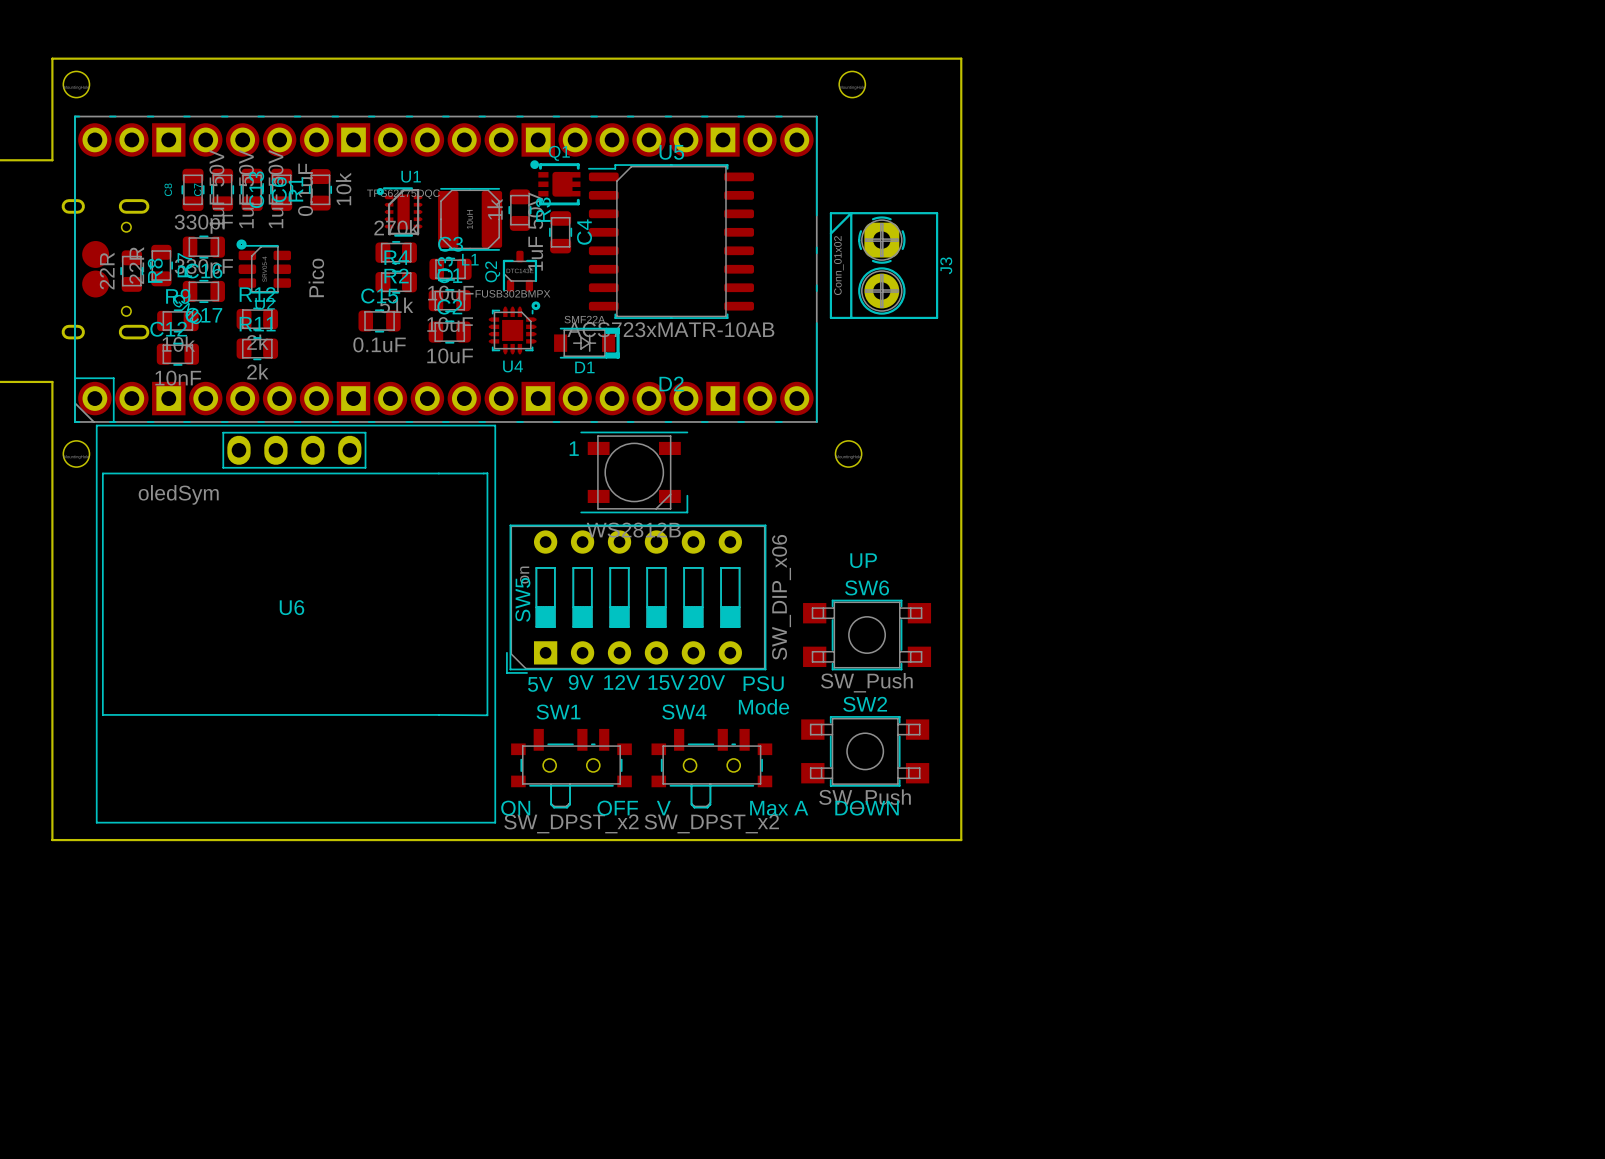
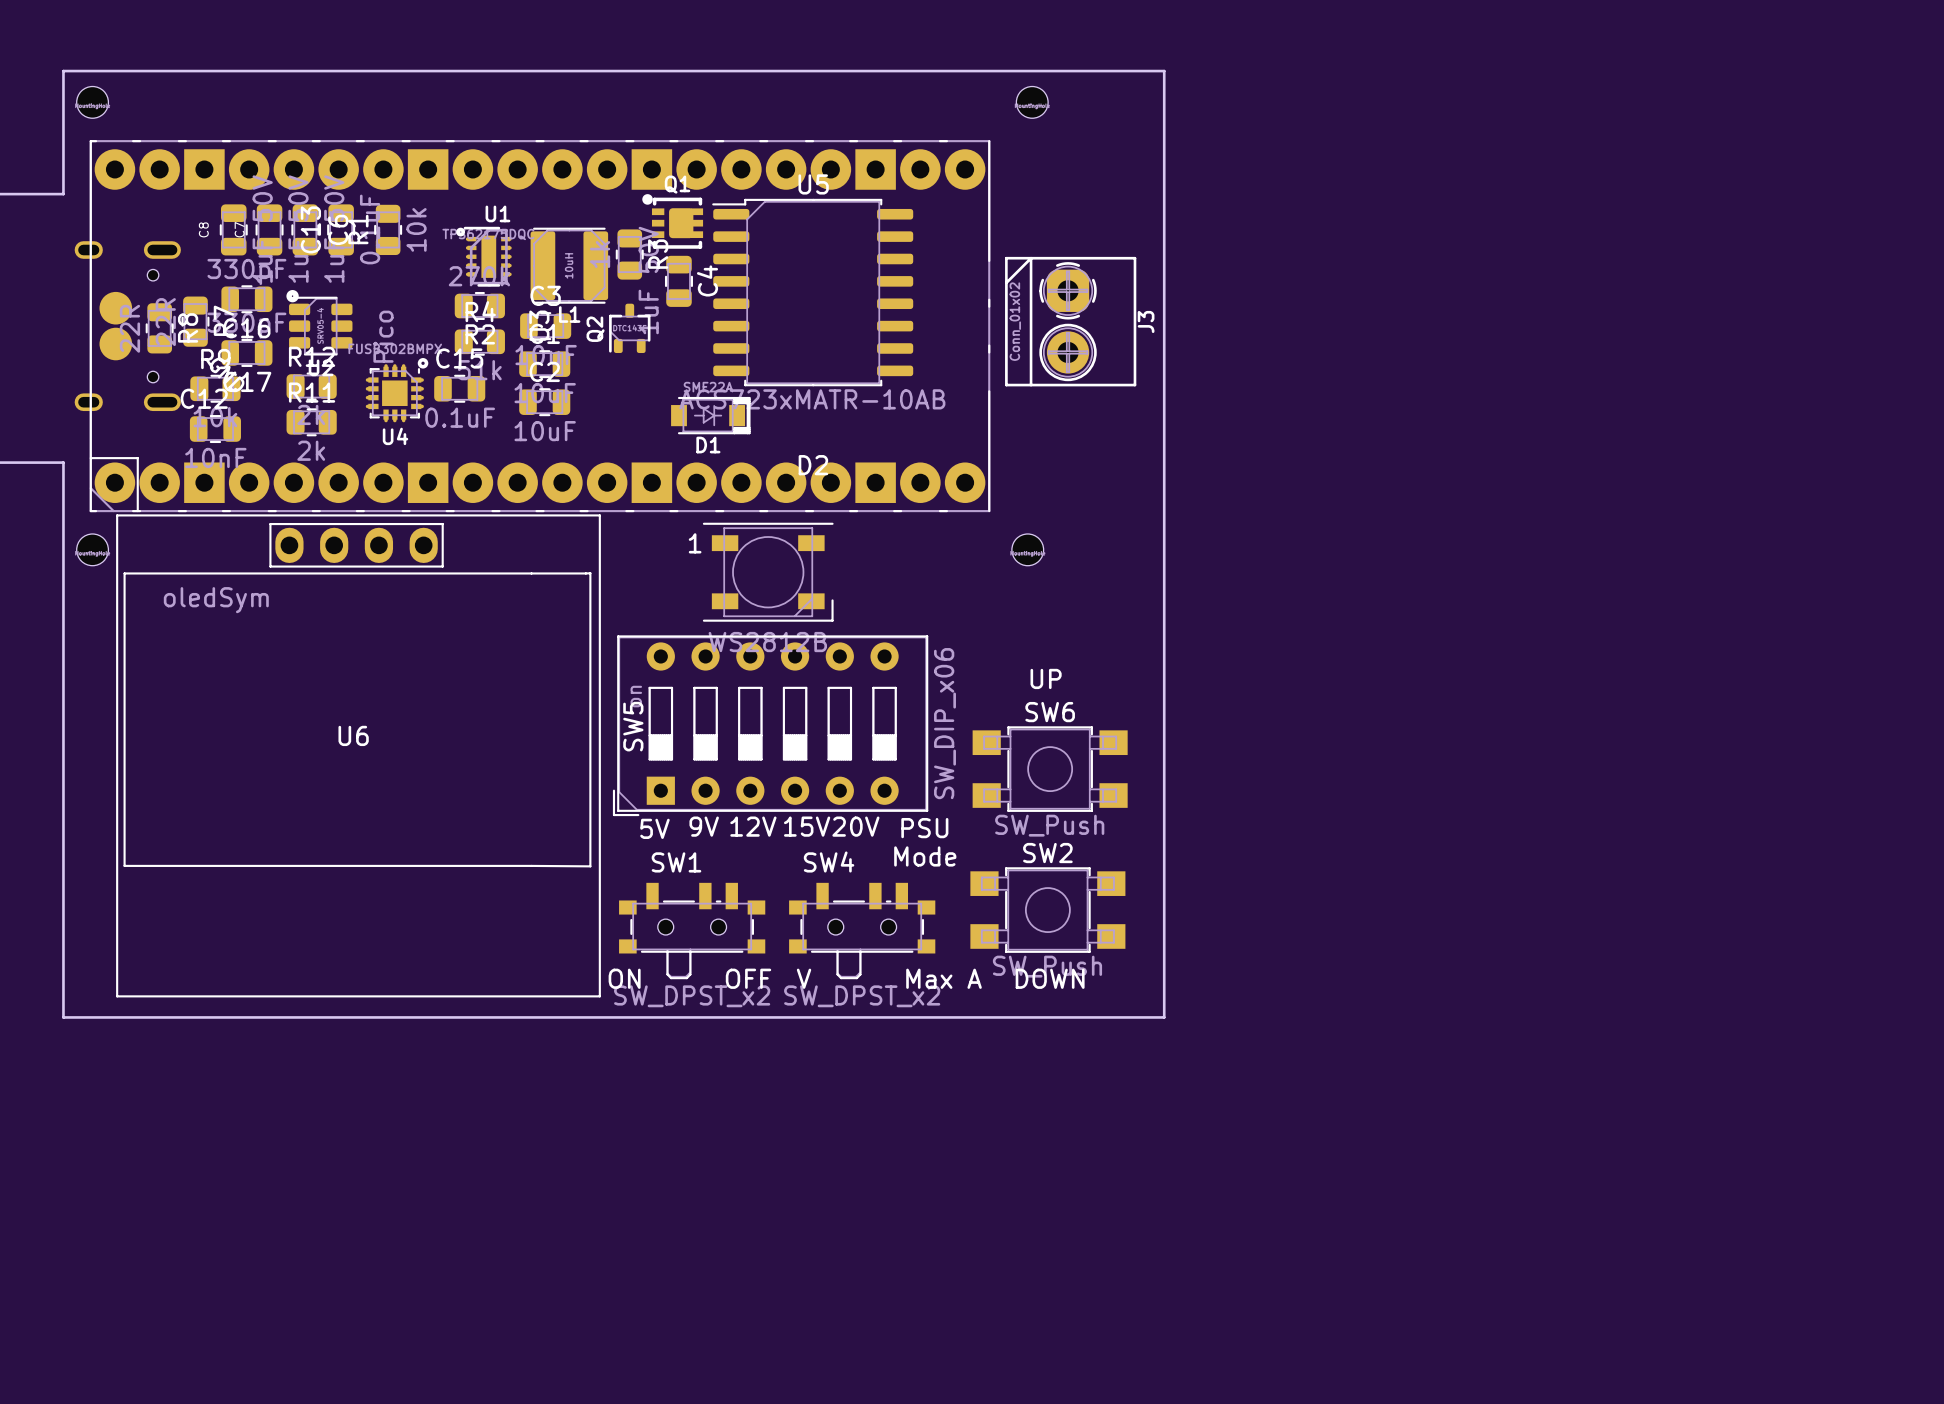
U4 position: (514, 327) -> (397, 390)

